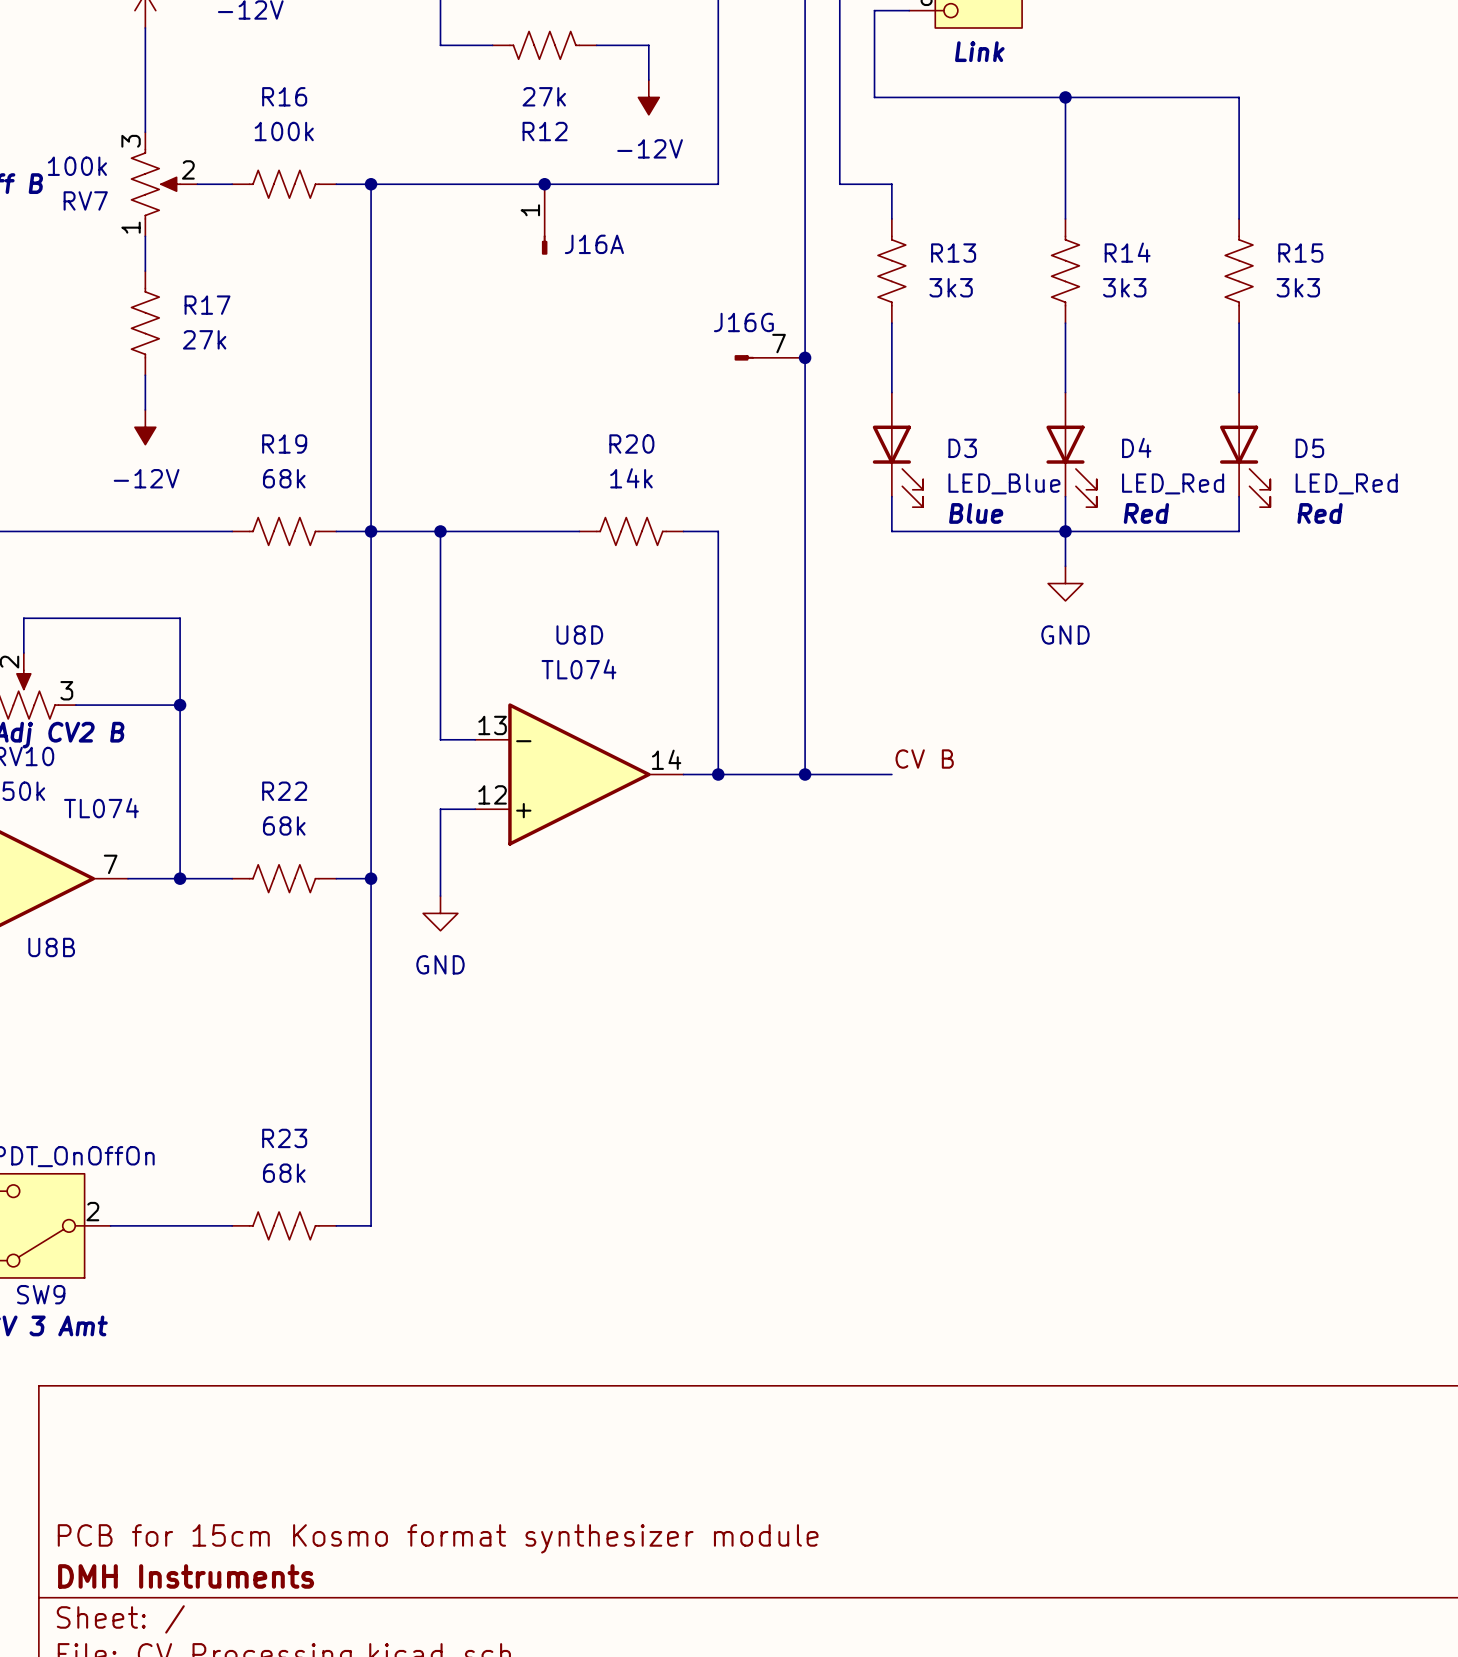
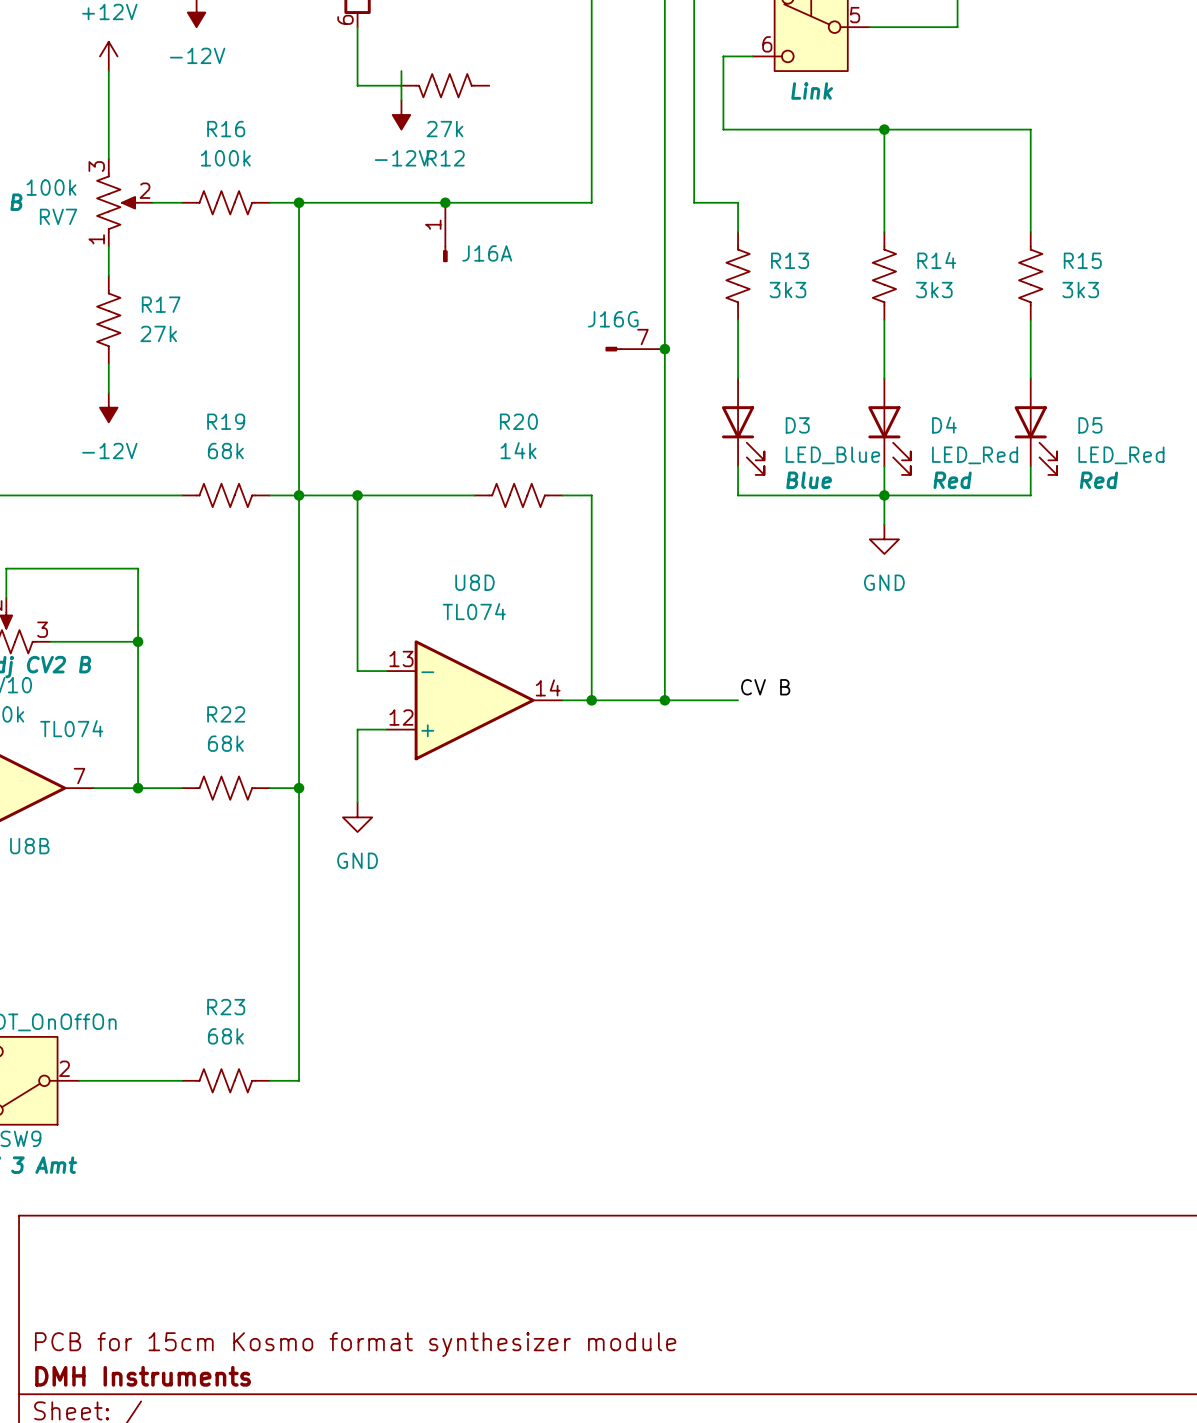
wire: none -> (401, 71) (401, 100)
wire: (596, 45) (648, 45) (648, 80) -> none
power symbol position: -12V (648, 97) -> -12V (401, 114)

